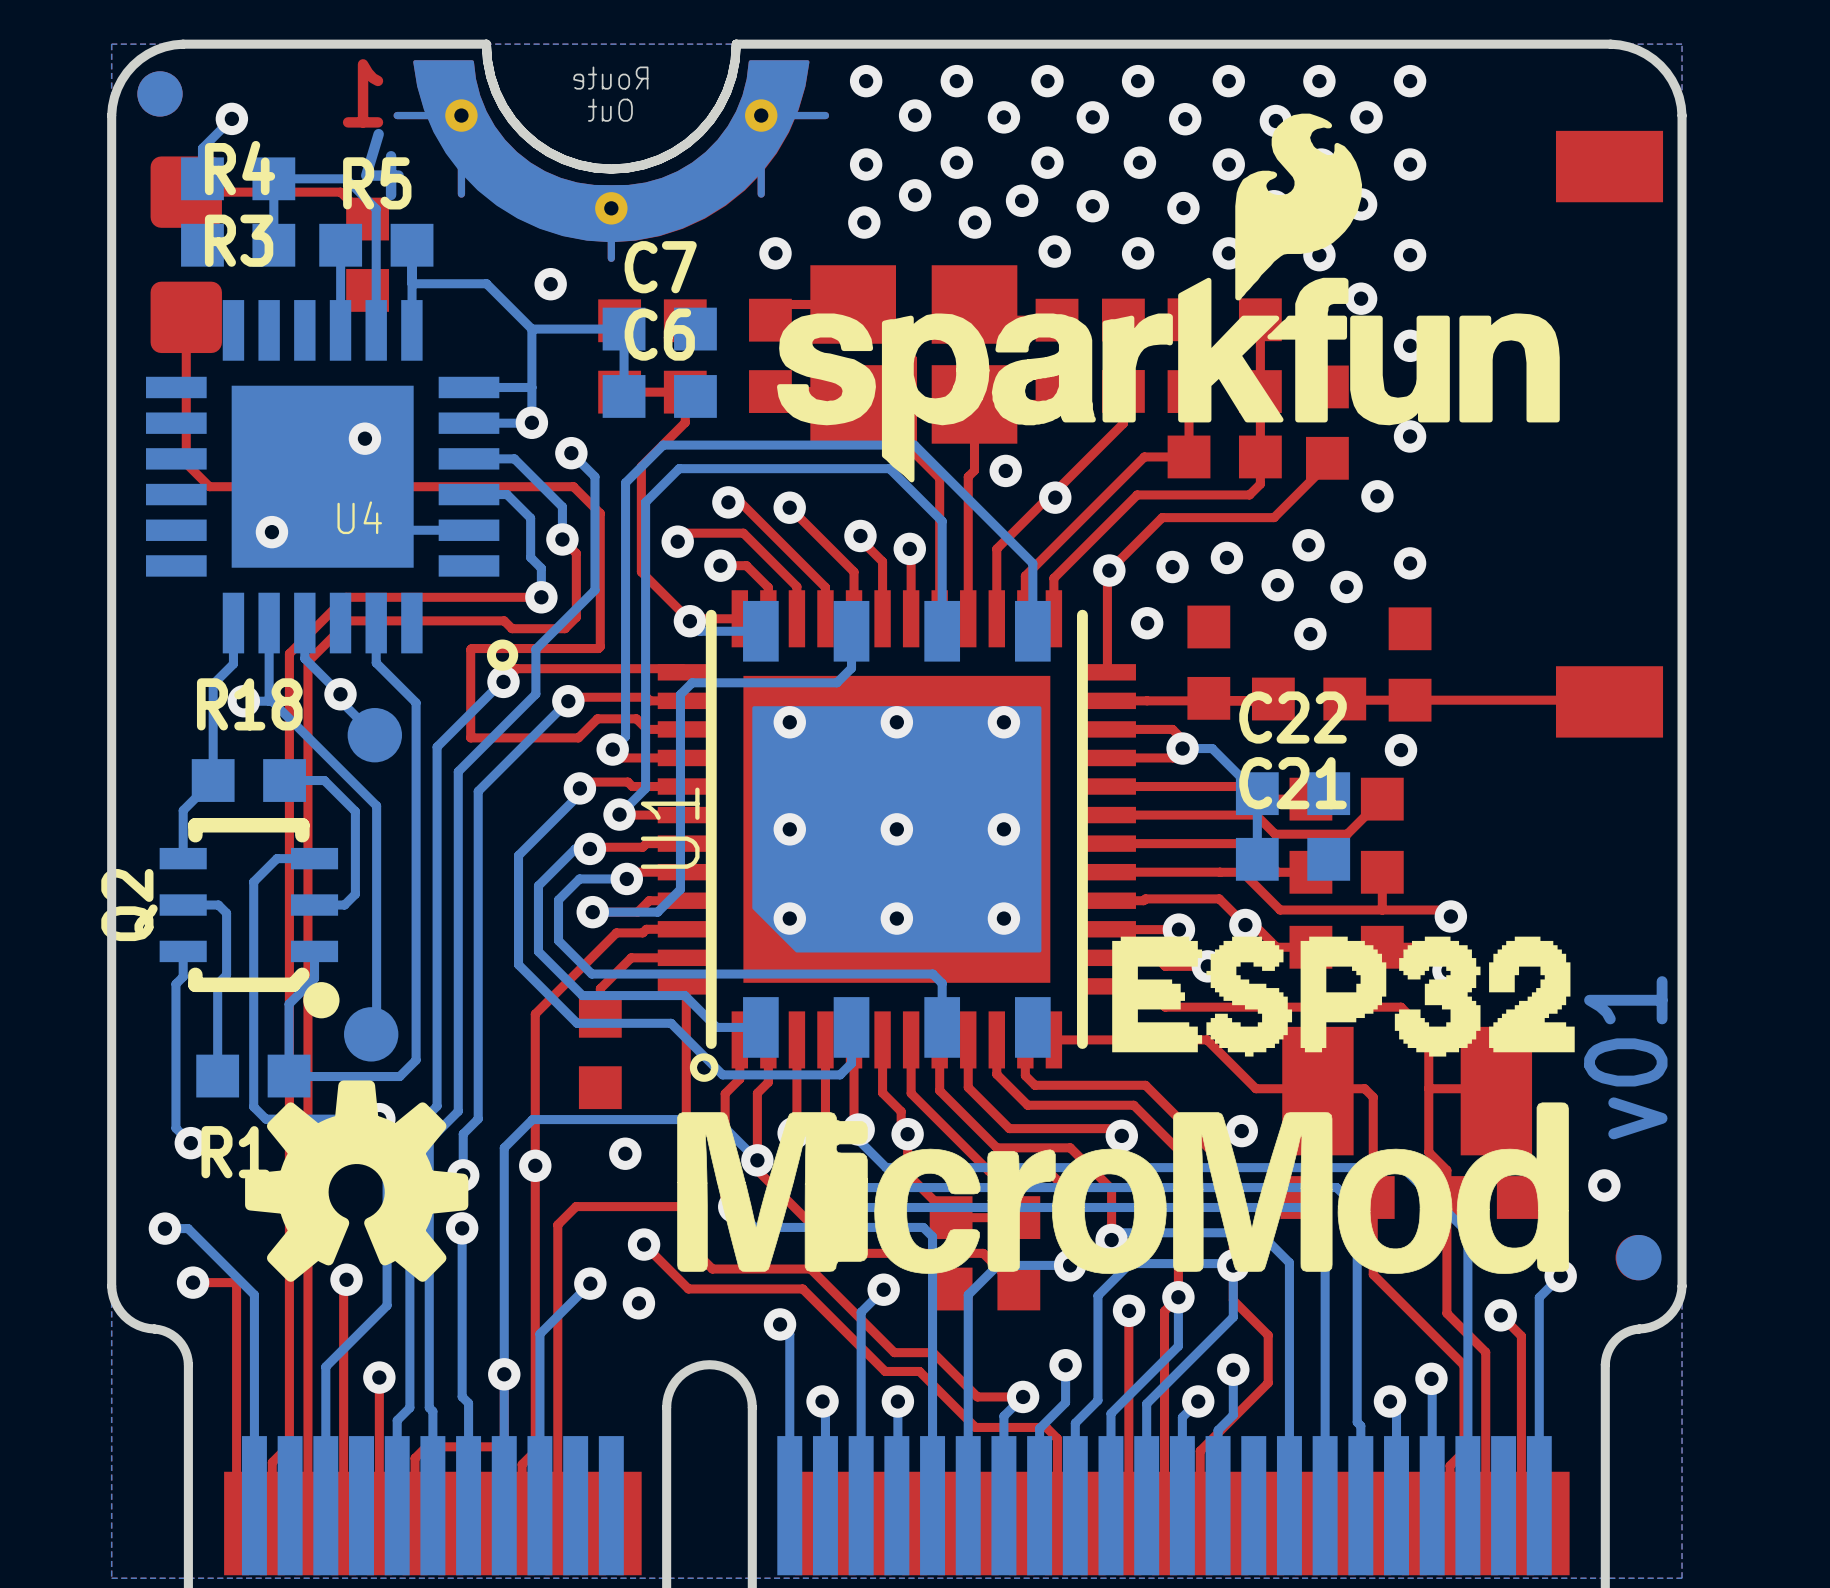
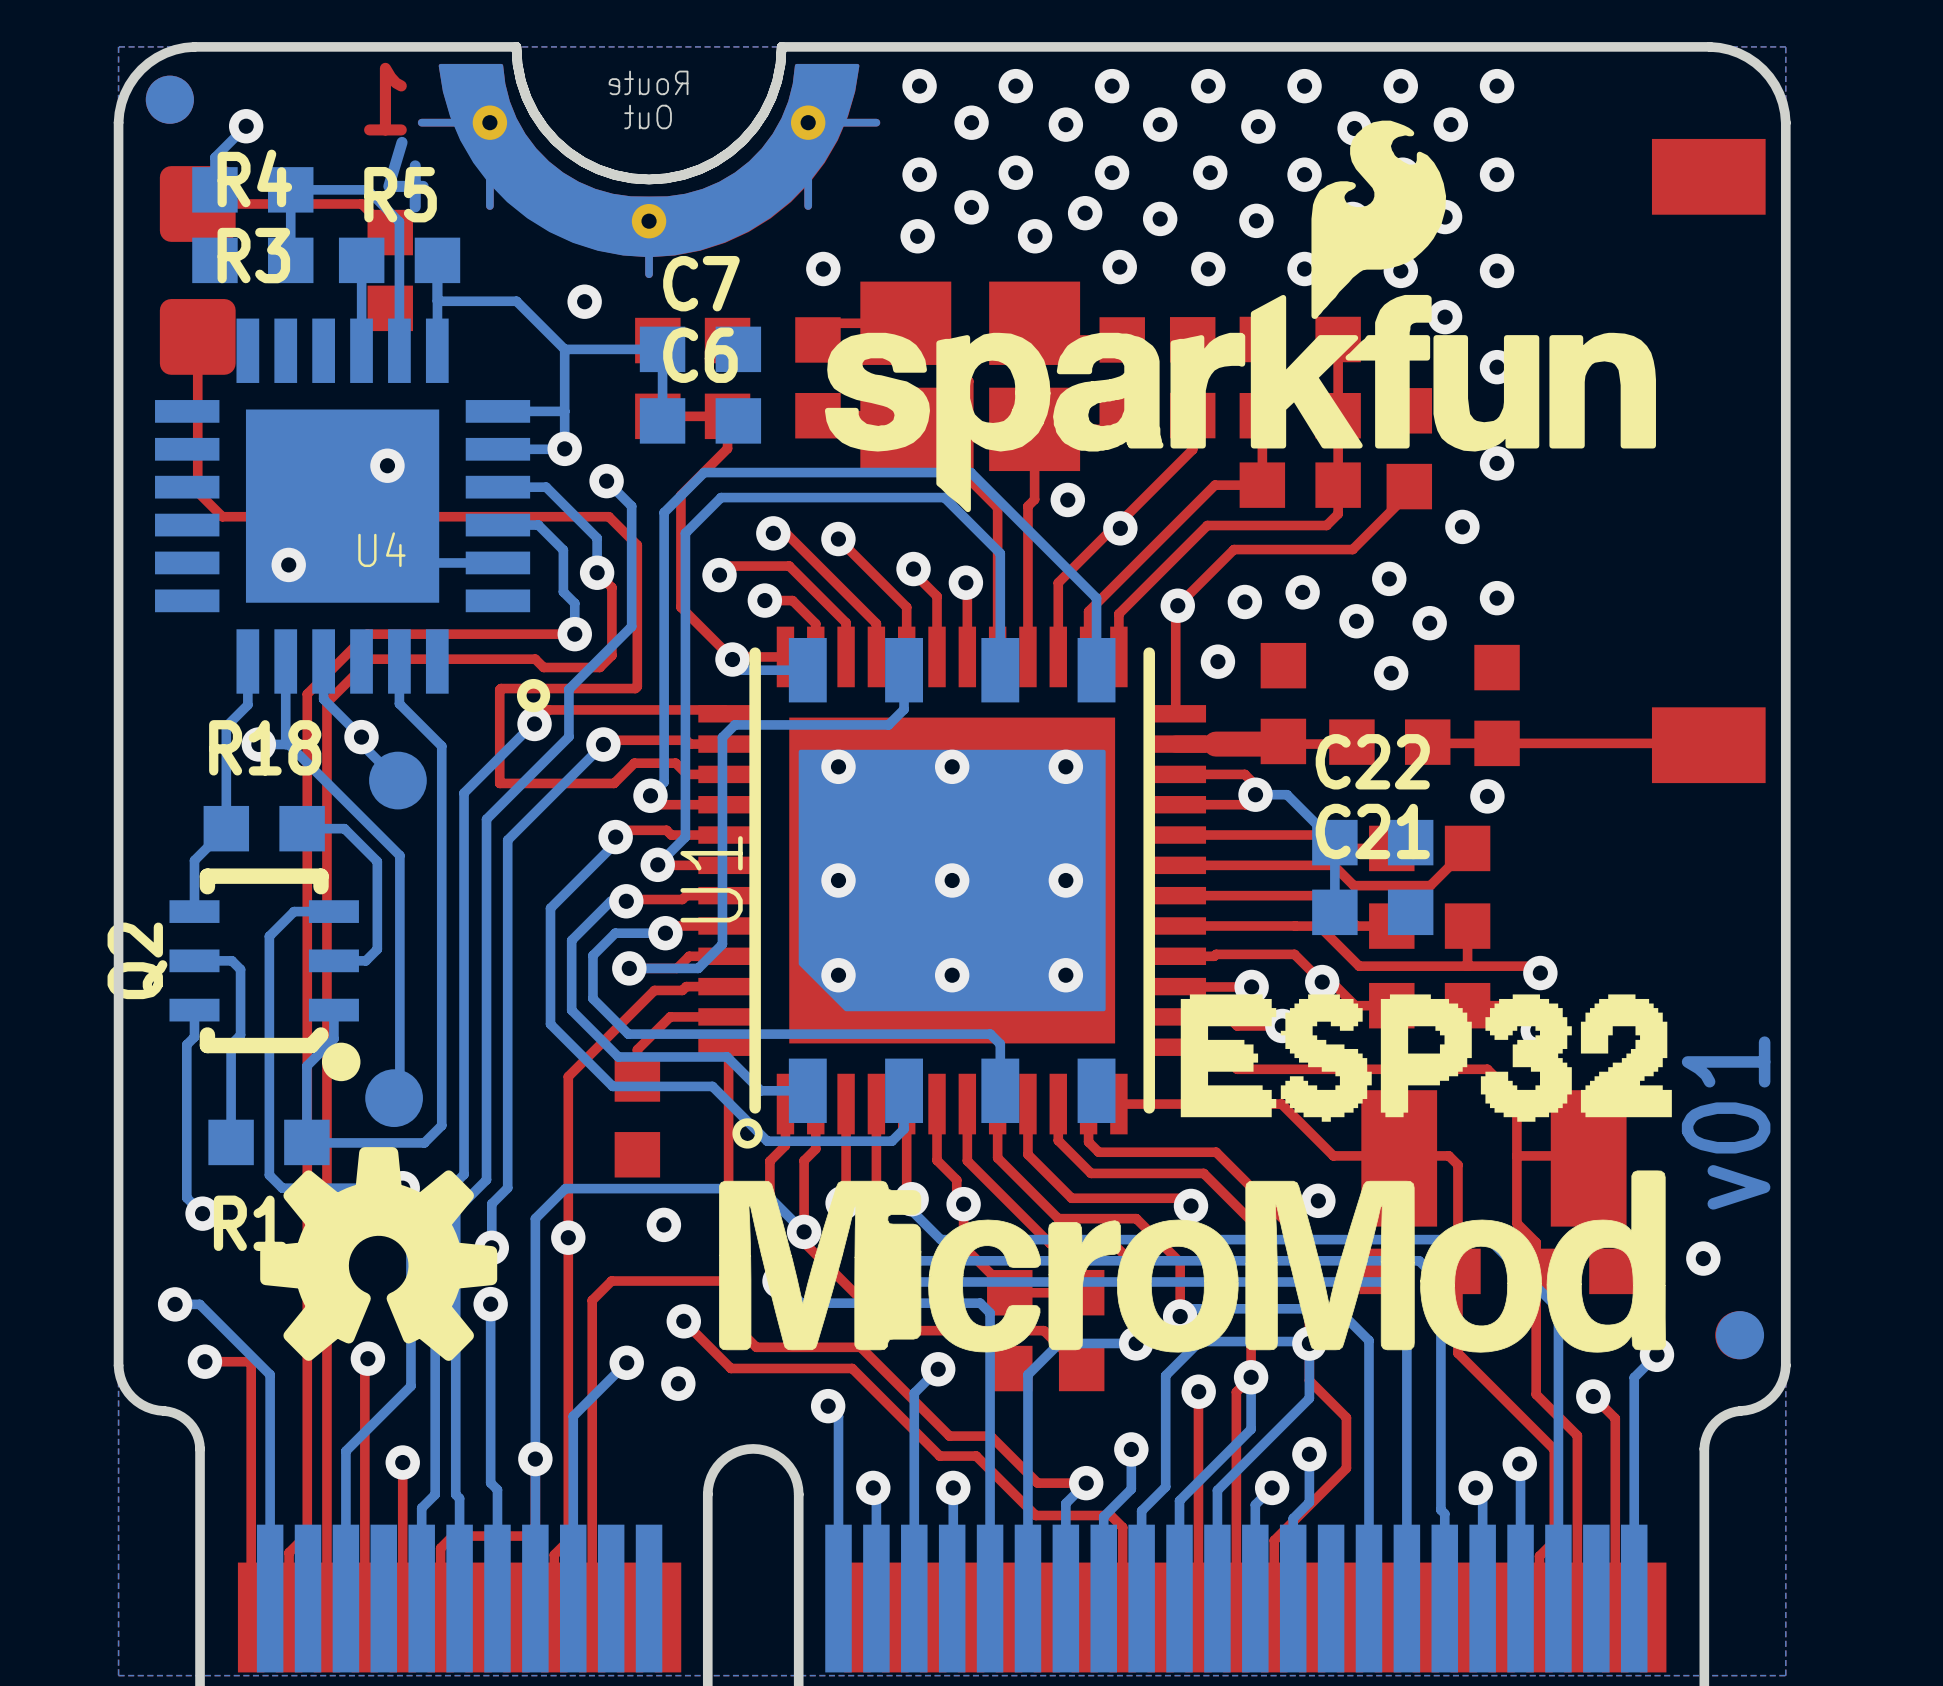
top track width: thin (1255, 700) (1107, 700) -> thick (1332, 744) (1175, 744)

